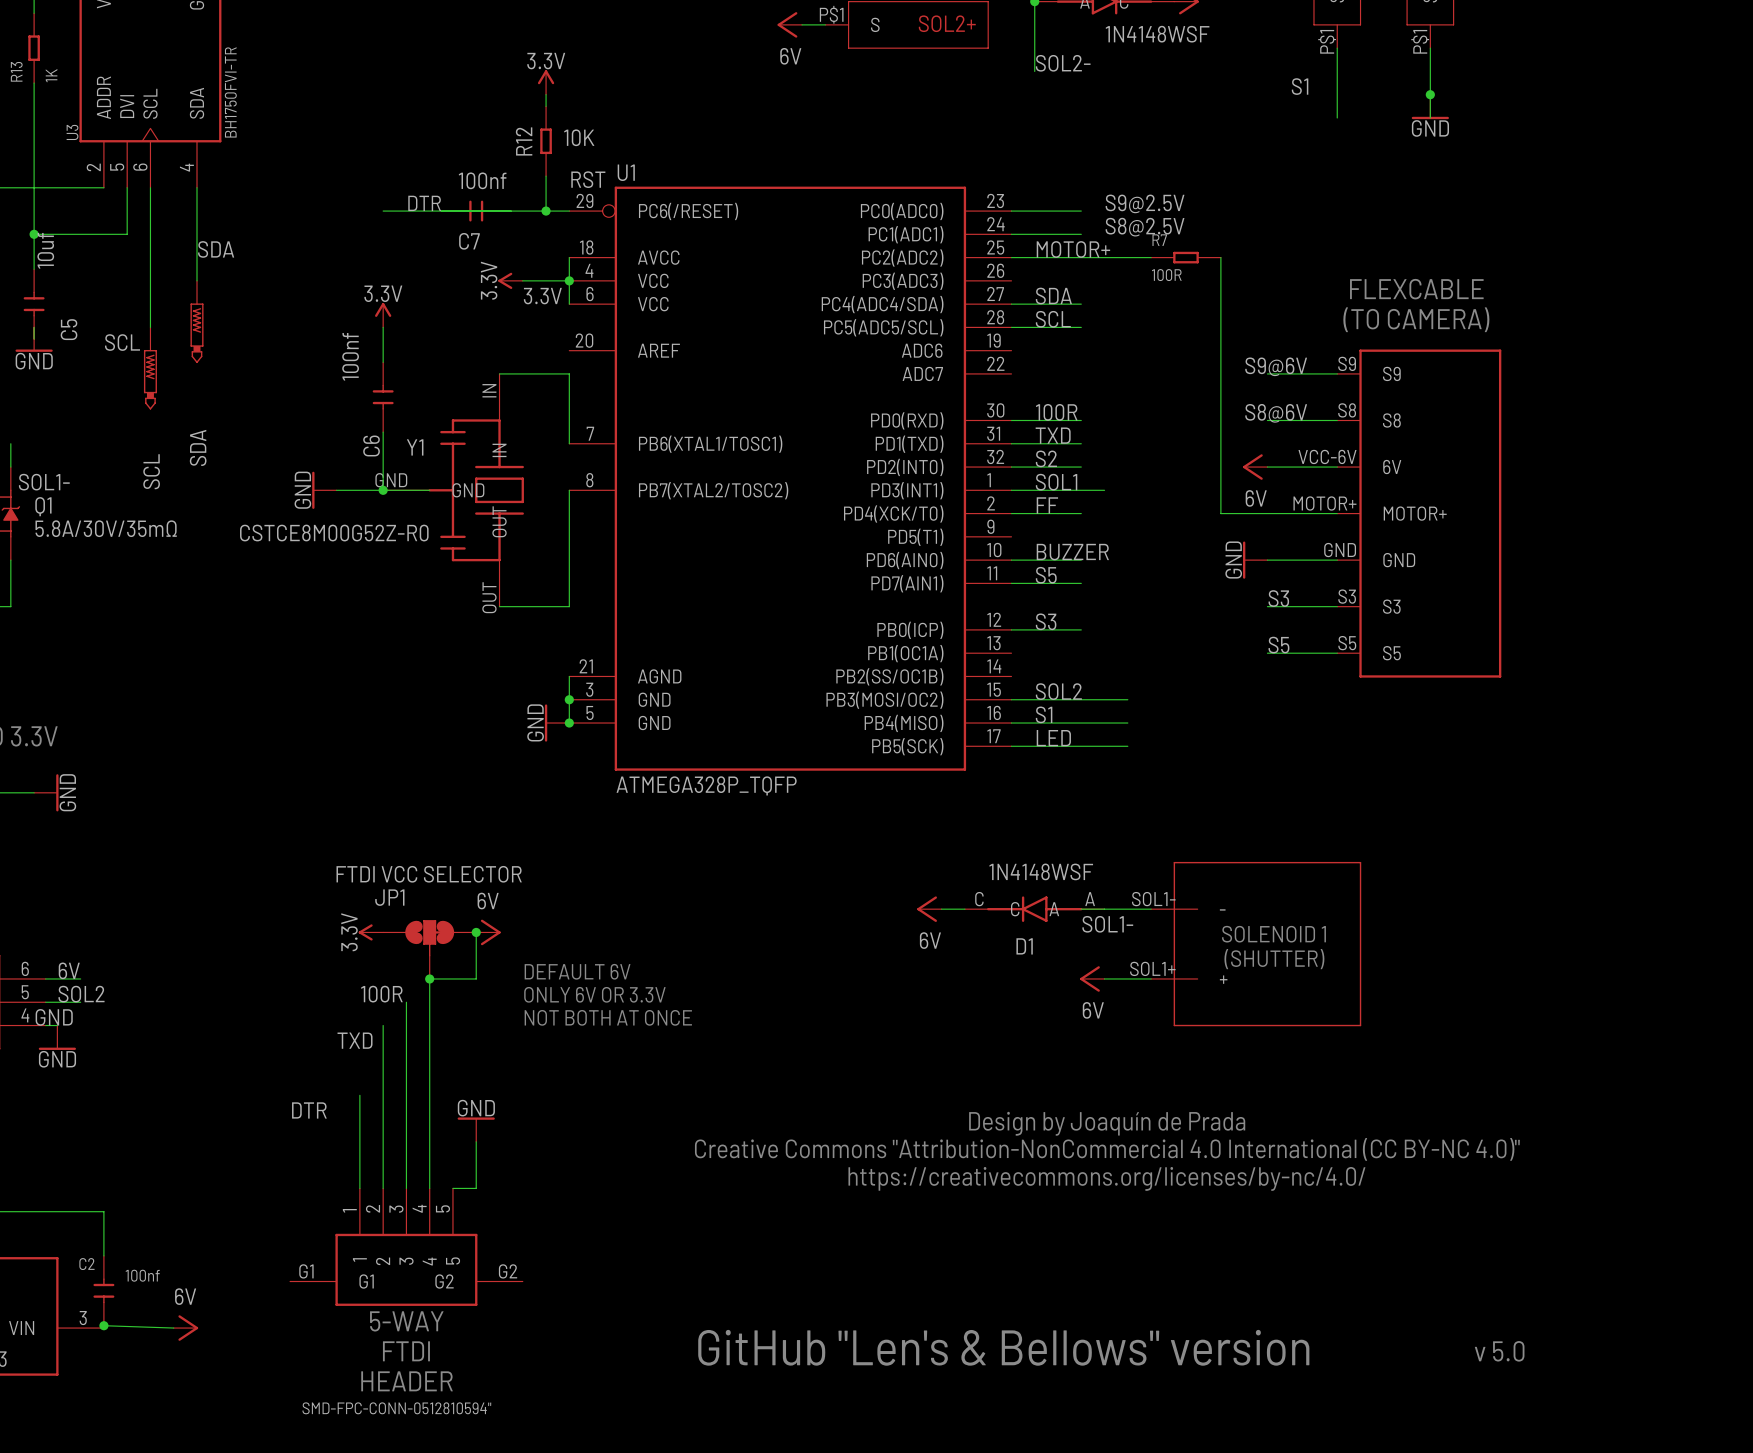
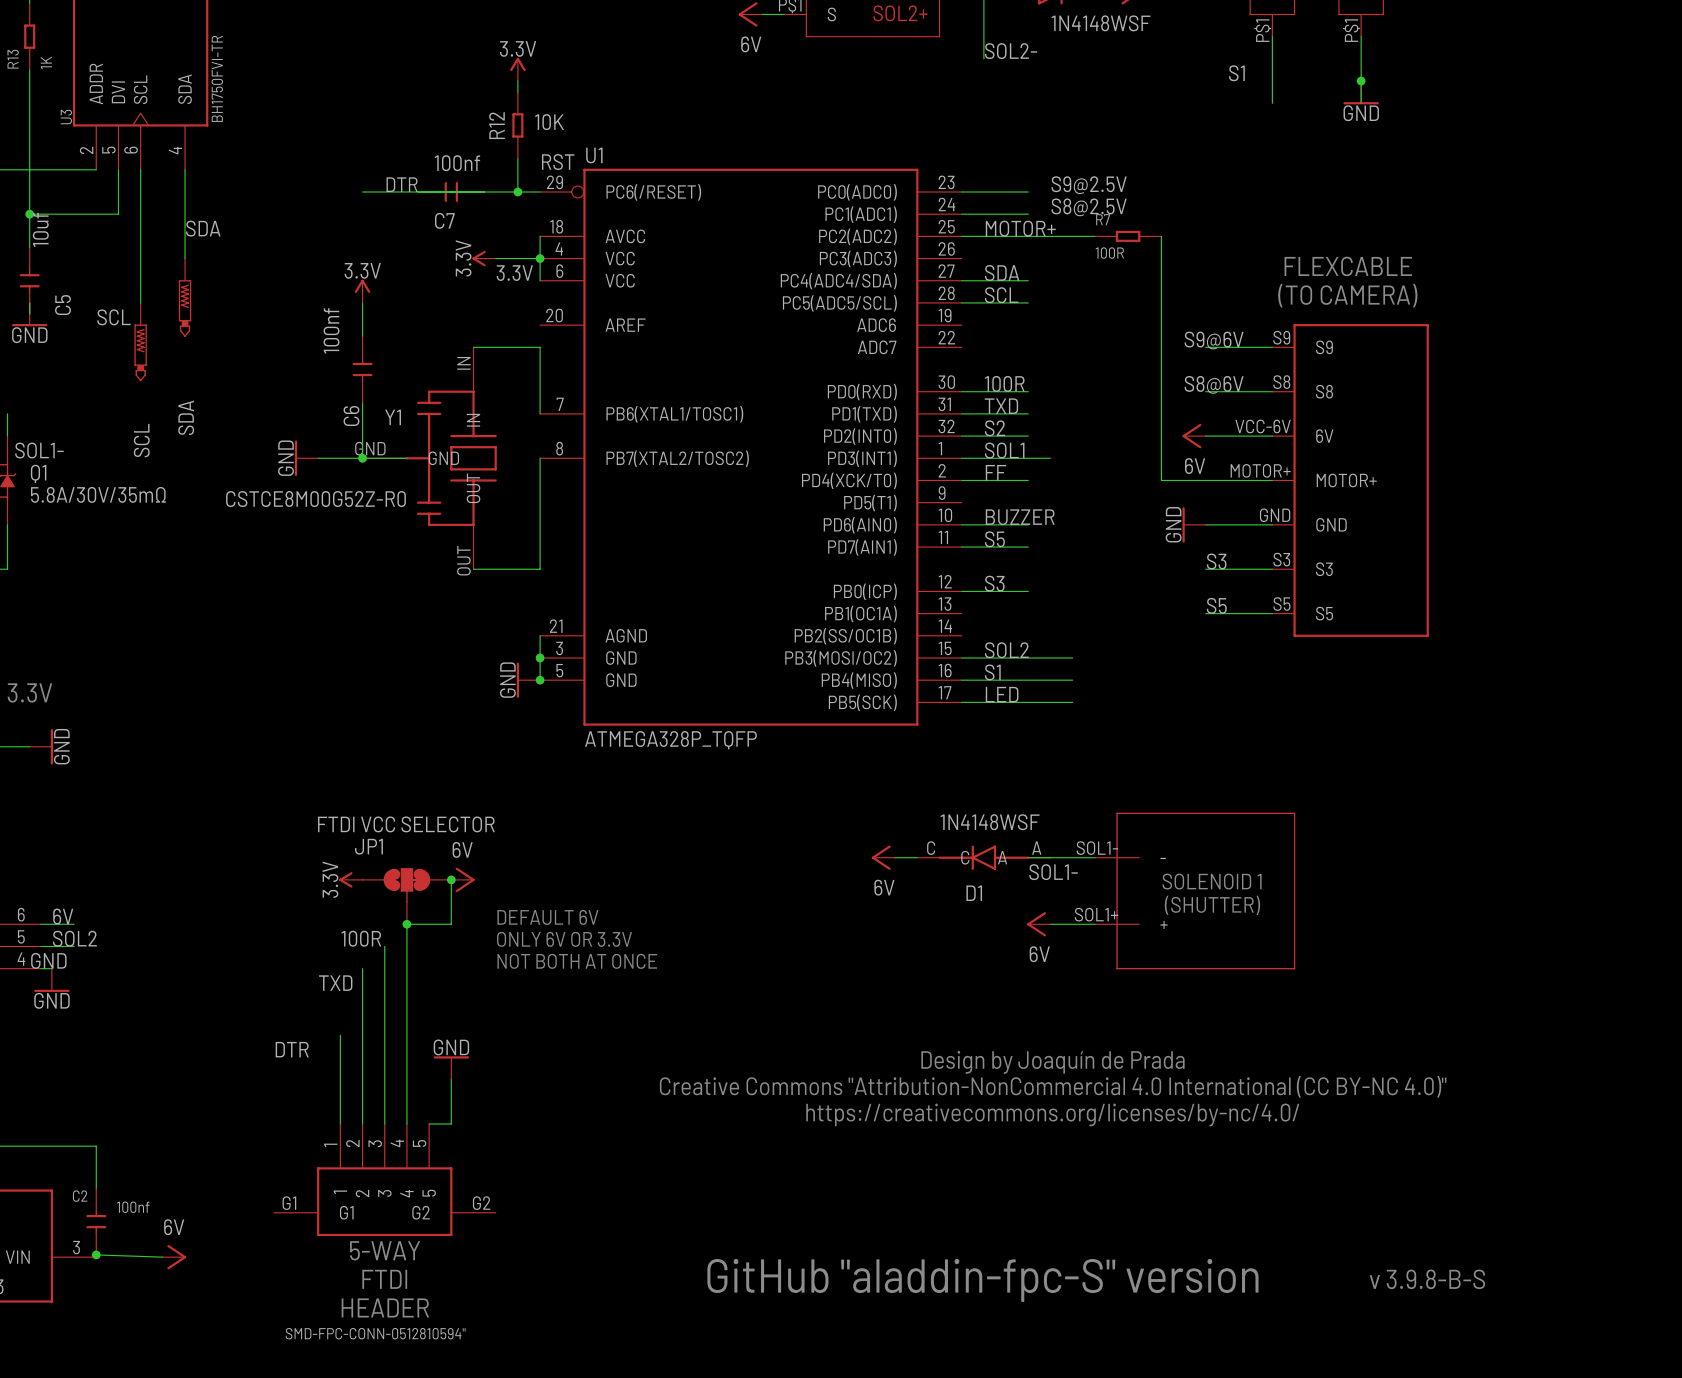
text: GitHub "Len's & Bellows" version (1003, 1347) -> none
text: v 5.0 (1499, 1351) -> v 3.9.8-B-S (1427, 1279)
text: none -> GitHub "aladdin-fpc-S" version (982, 1280)

